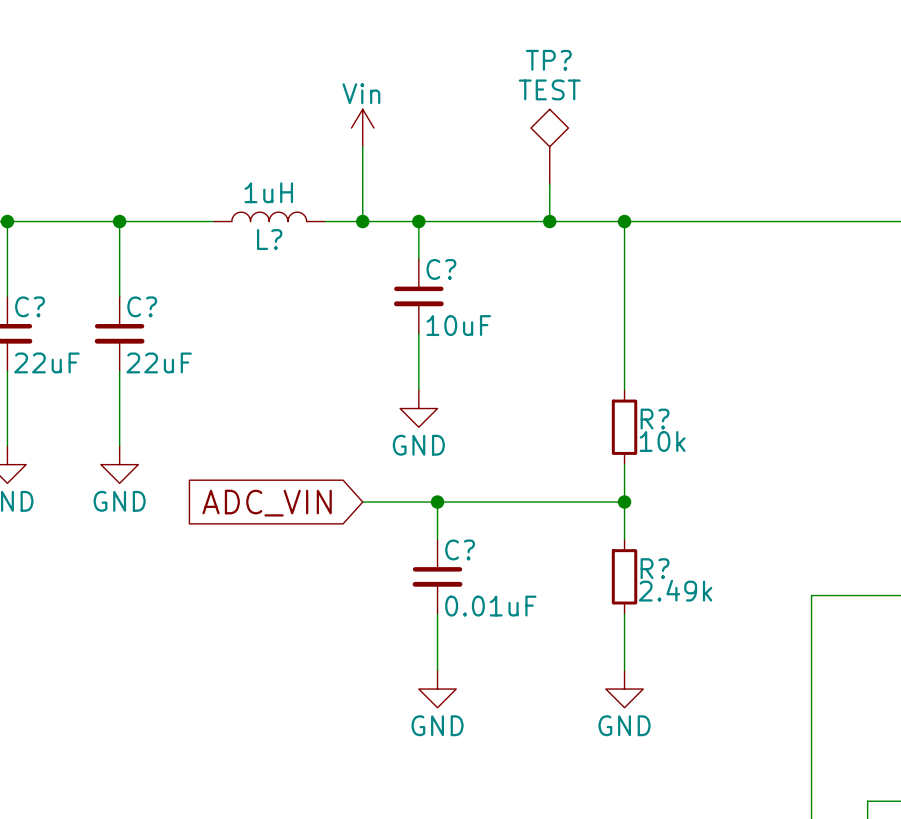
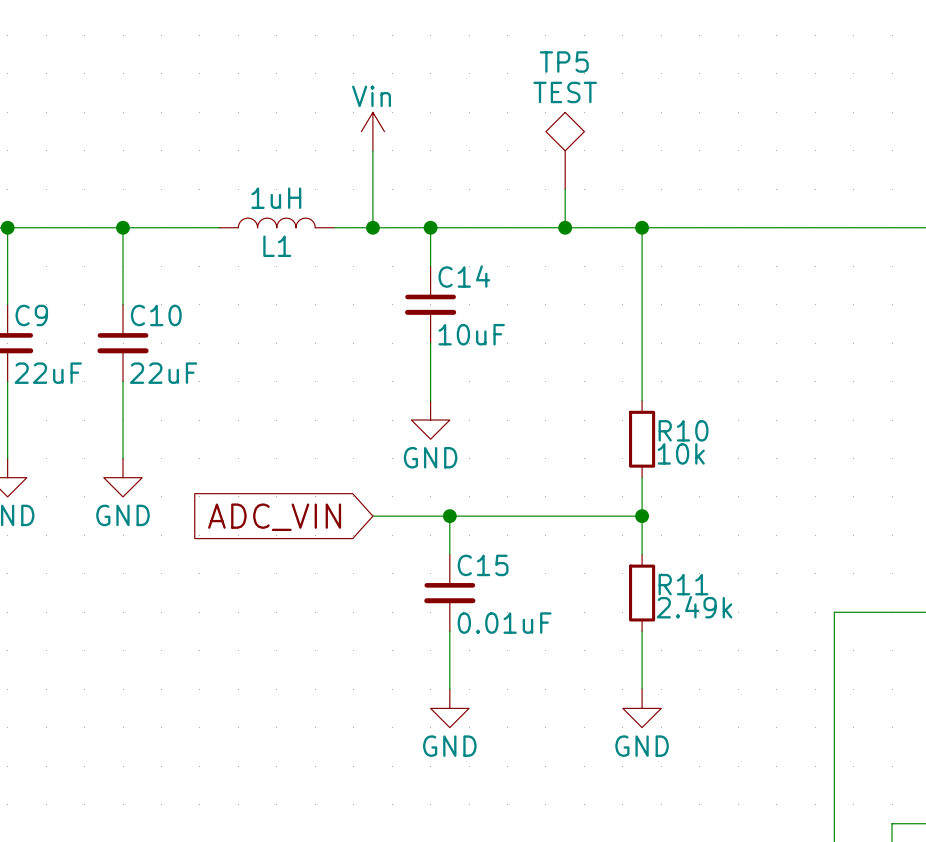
TP? name: TP? (548, 60) -> TP5 (564, 61)
L? name: L? (269, 239) -> L1 (277, 246)
C? name: C? (441, 269) -> C14 (464, 276)
C? name: C? (30, 306) -> C9 (31, 315)
C? name: C? (142, 306) -> C10 (156, 315)
R? name: R? (655, 419) -> R10 (683, 430)
C? name: C? (460, 549) -> C15 (483, 565)
R? name: R? (655, 568) -> R11 (683, 584)

